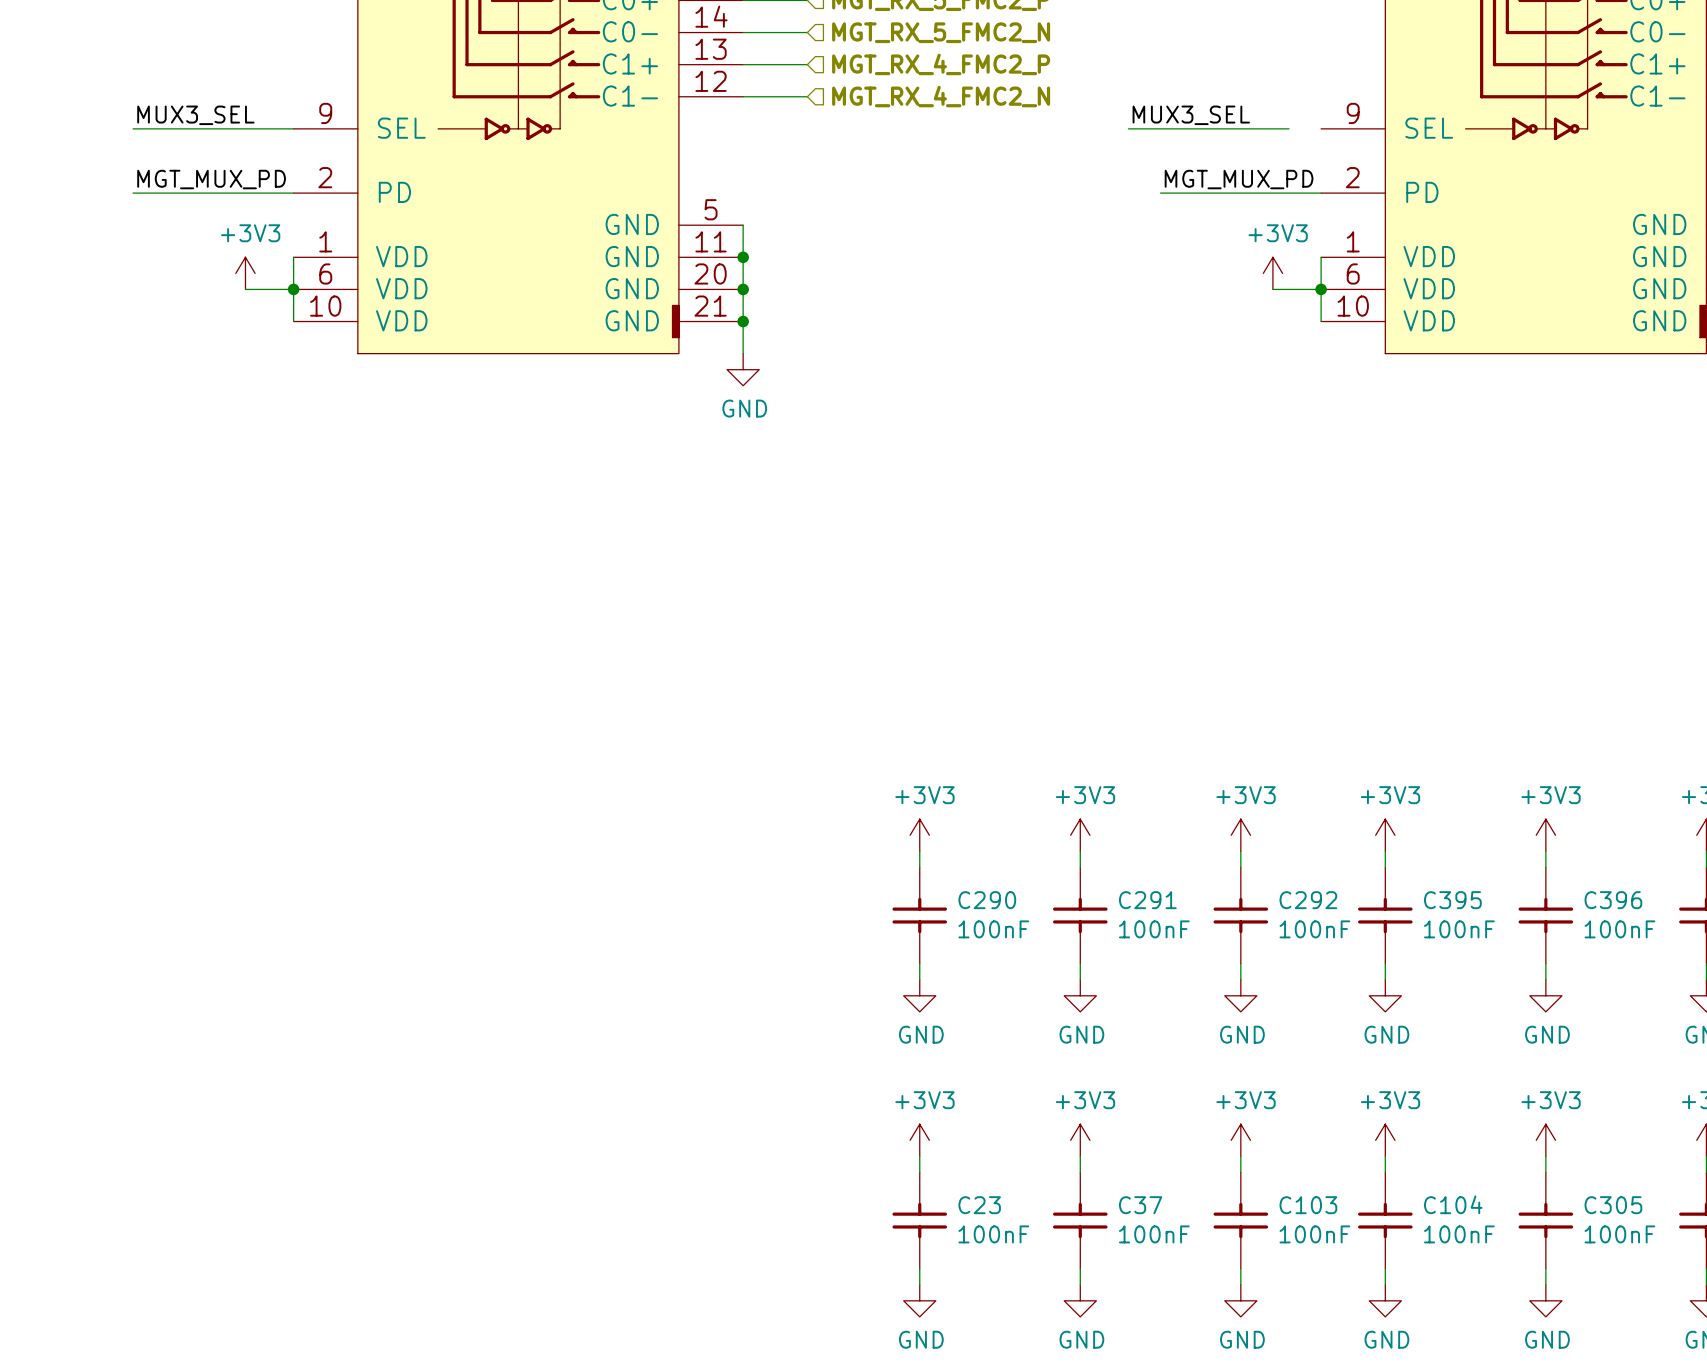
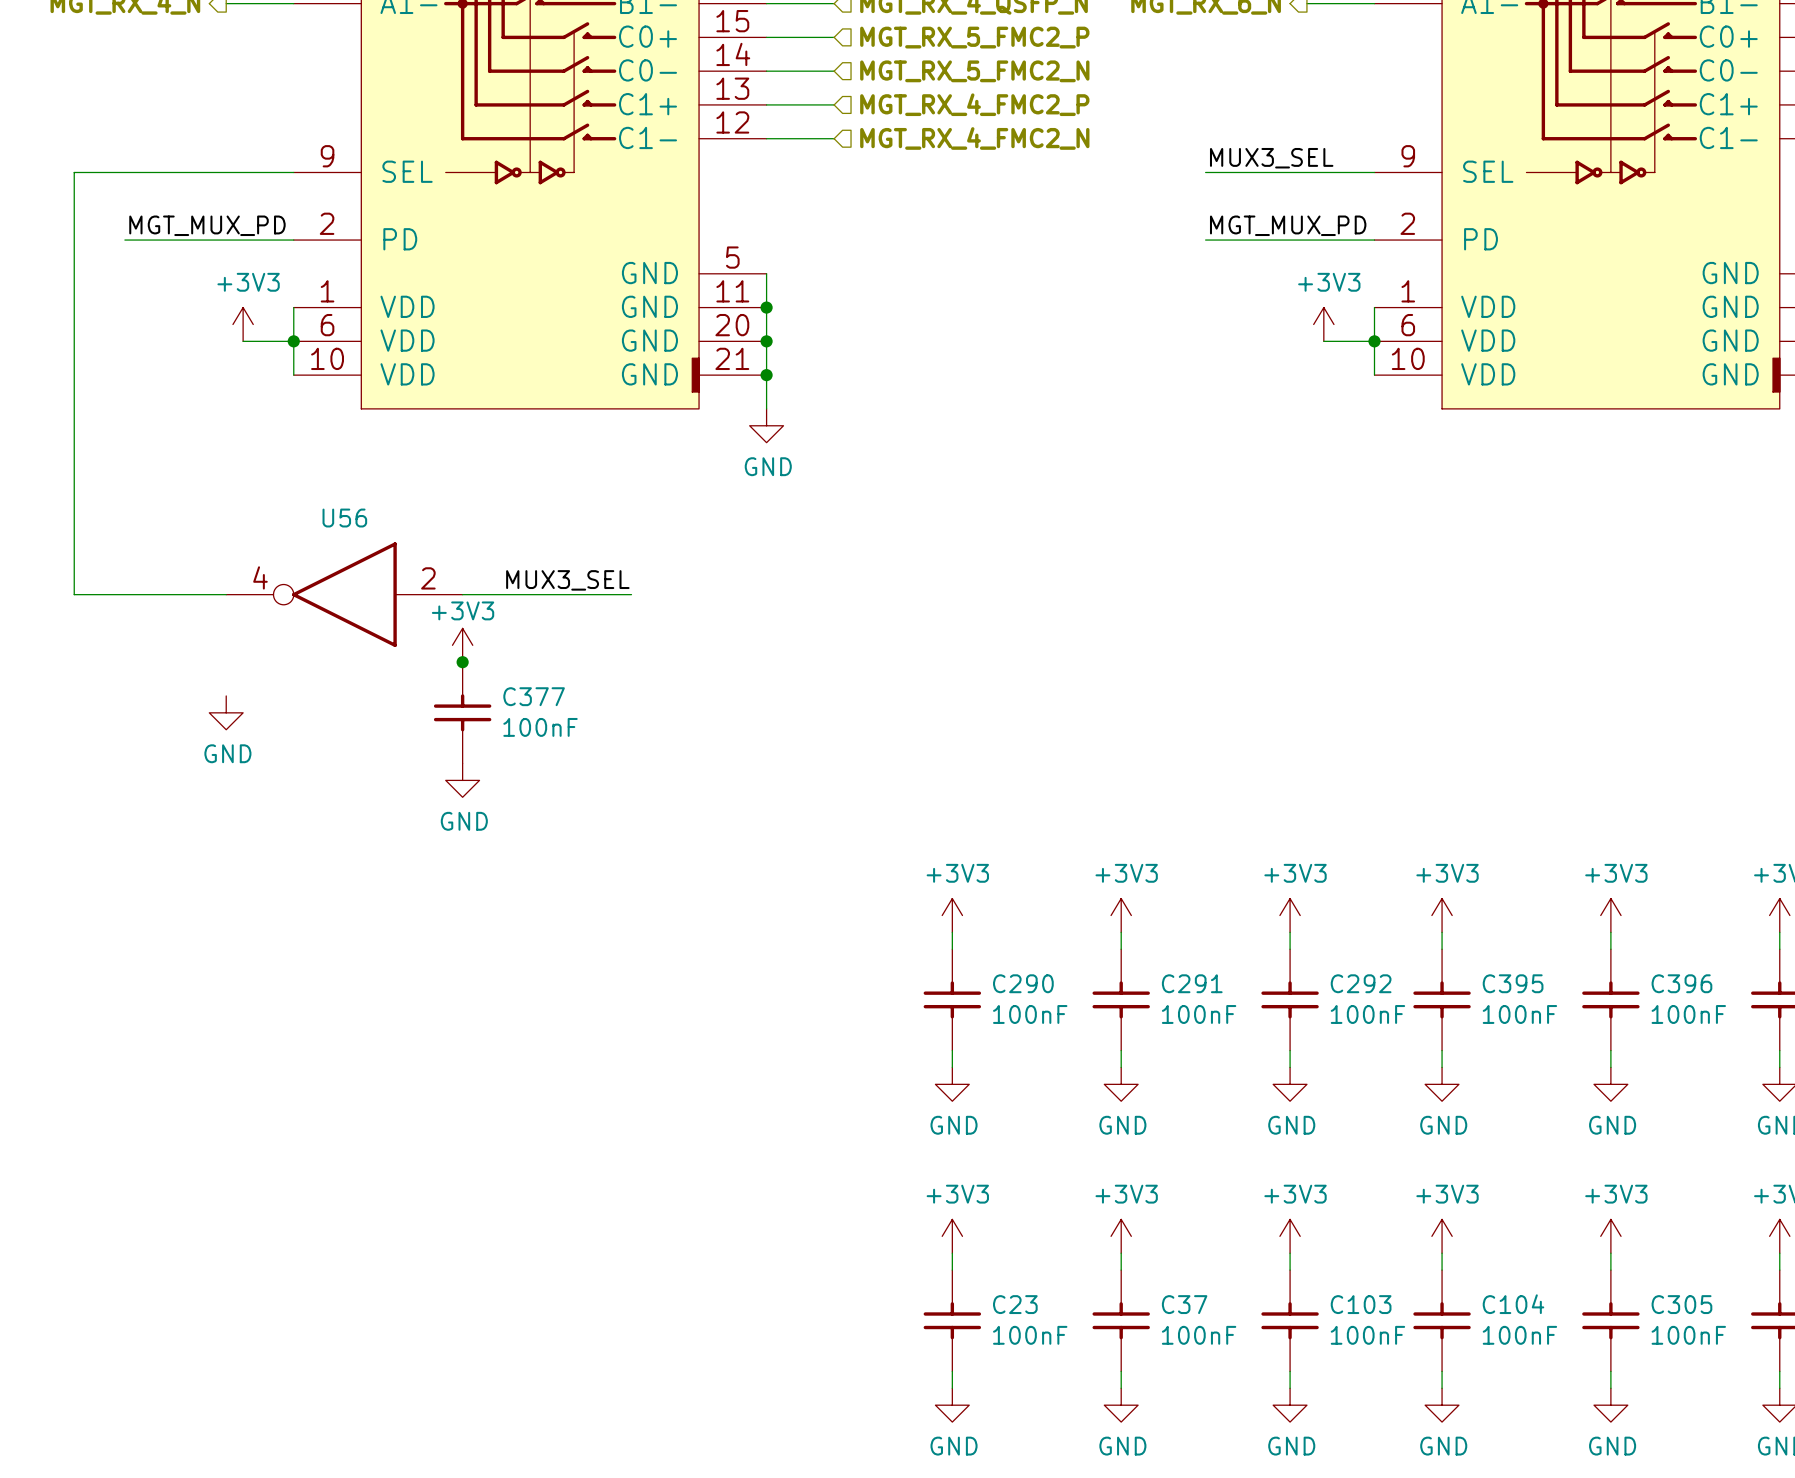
label: MUX3_SEL (195, 115) -> none
label position: MUX3_SEL (1191, 115) -> MUX3_SEL (1271, 158)
wire: none -> (124, 172) (74, 172) (74, 594) (226, 594)
wire: (1128, 128) (1160, 128) -> (1340, 172) (1374, 172)
label: none -> MUX3_SEL (567, 580)
U56: none -> (344, 594)
wire: none -> (462, 594) (631, 594)
power symbol: none -> +3V3 (462, 645)
junction: none -> (462, 662)
power symbol: none -> GND (226, 712)
C377: none -> (462, 712)
power symbol: none -> GND (462, 780)

